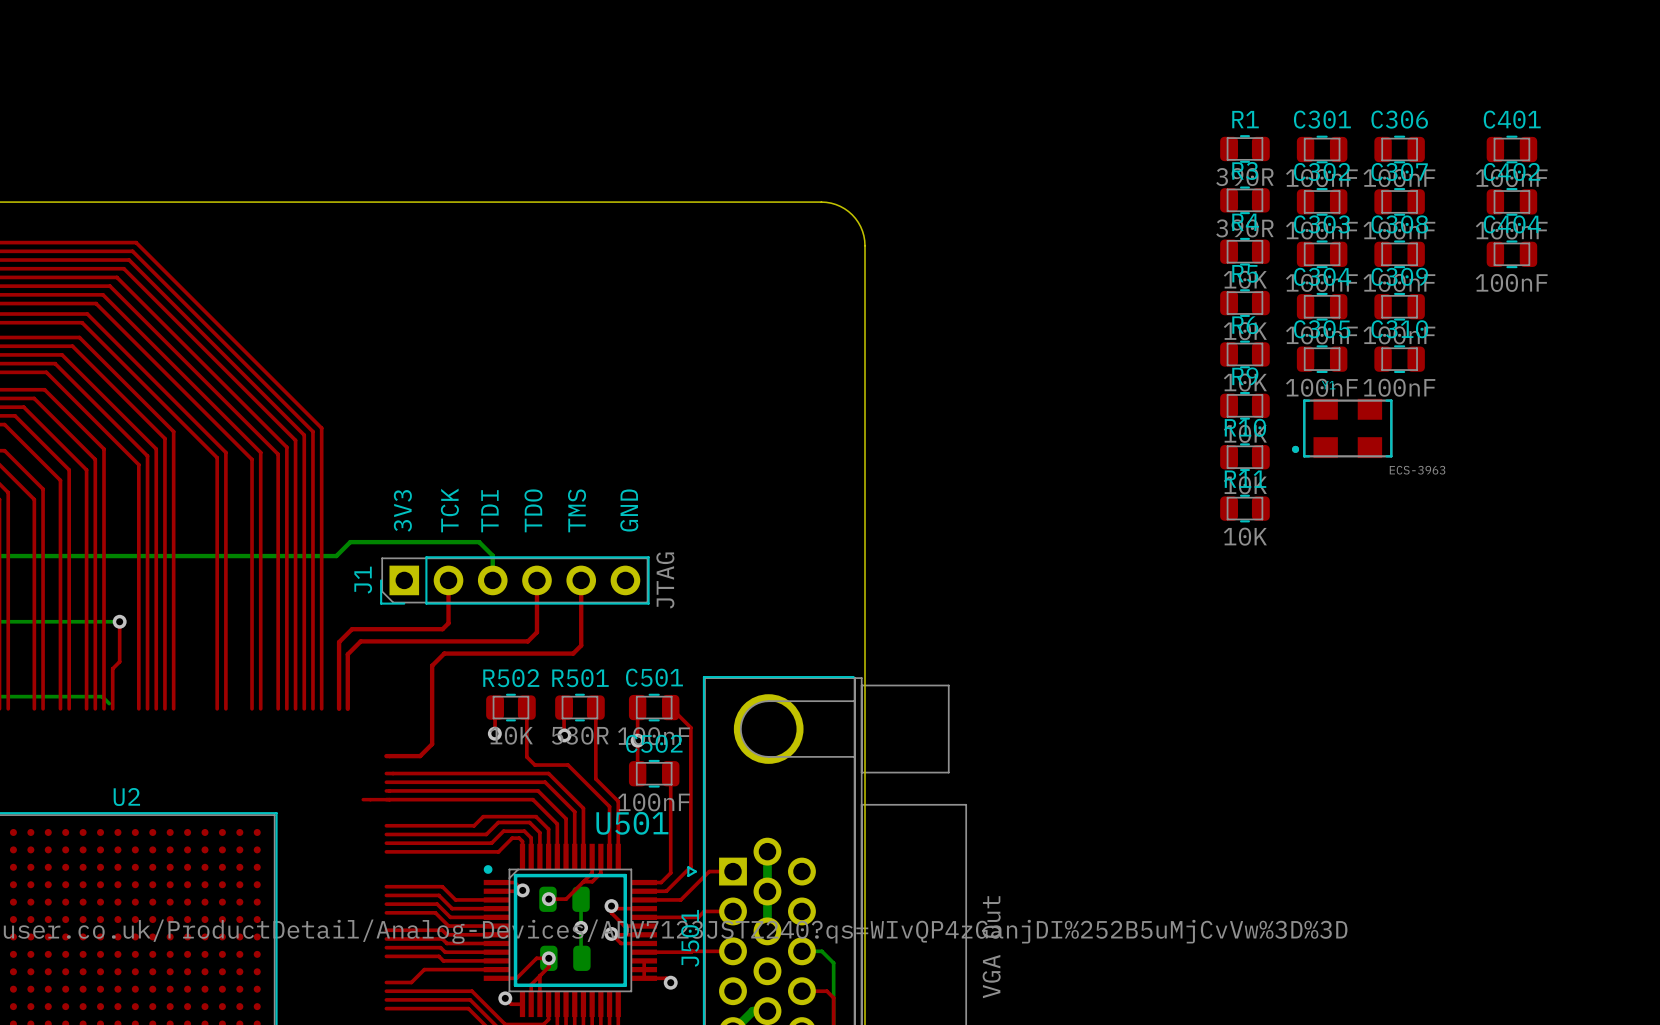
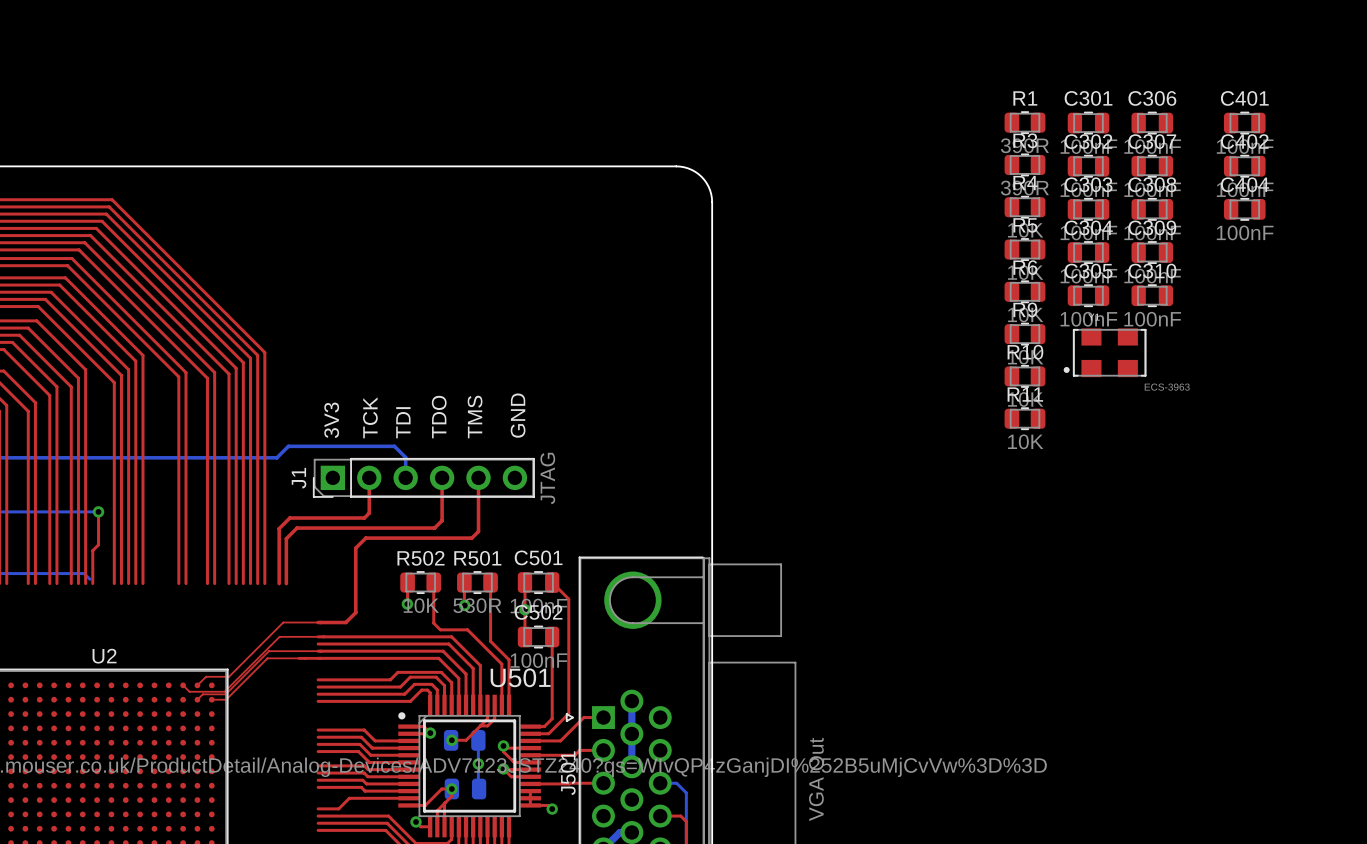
top track: none -> (320, 622) (283, 622) (228, 676) (206, 676) (197, 685)
top track: none -> (323, 636) (279, 636) (224, 691) (189, 691) (183, 685)
top track: none -> (320, 651) (268, 651) (225, 694) (202, 694) (197, 699)
top track: none -> (304, 658) (267, 658) (226, 699) (211, 699)

